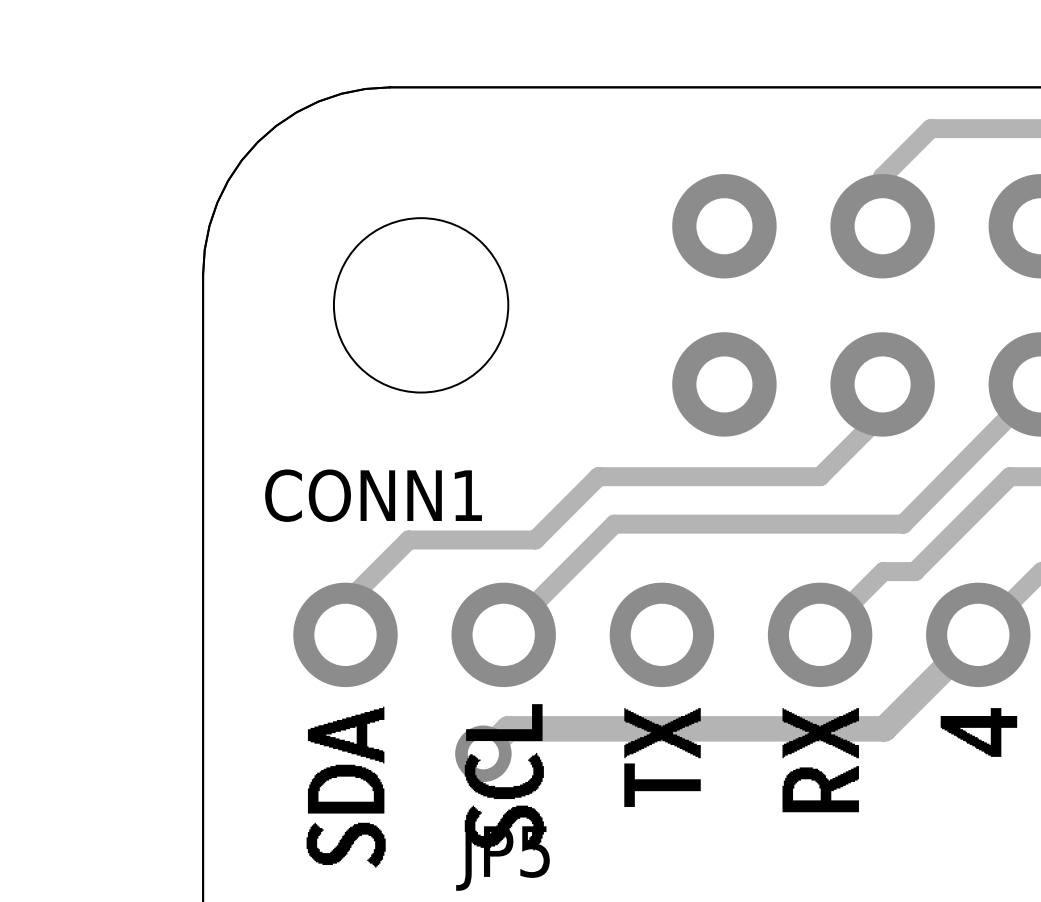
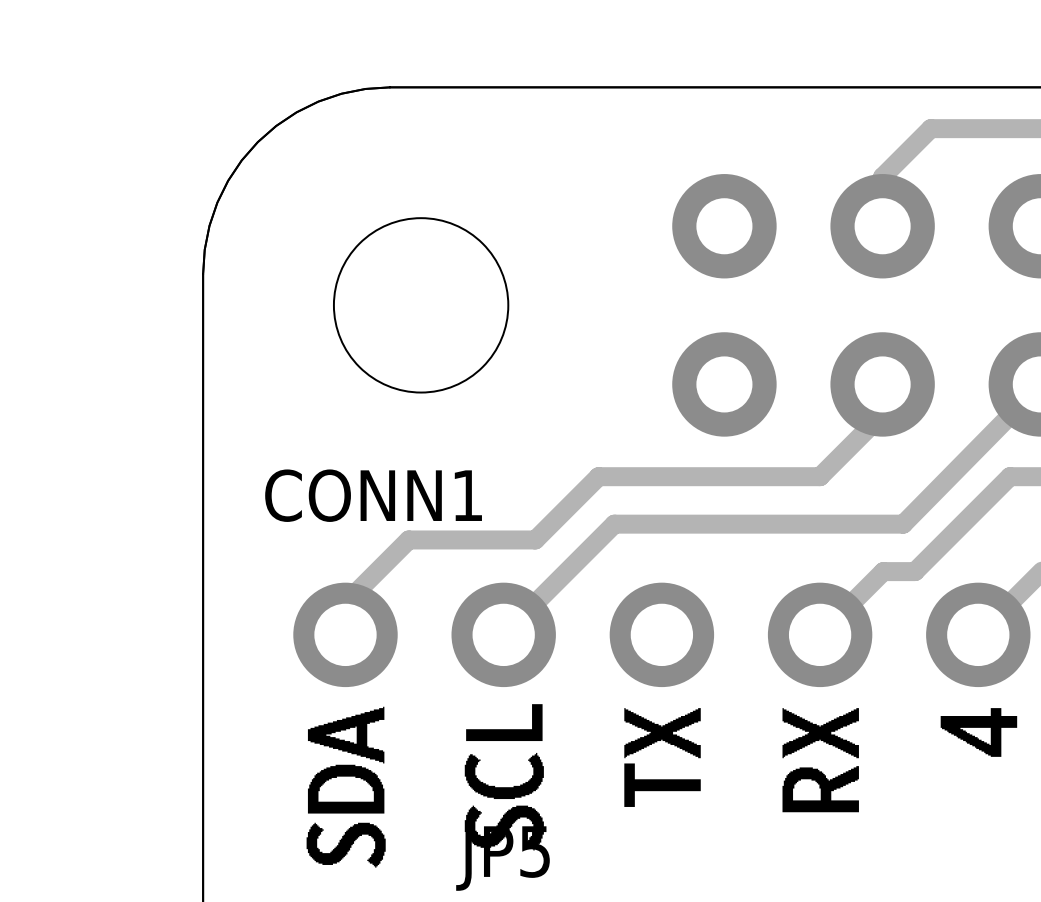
track: (978, 634) (884, 728) (508, 728) (483, 753) -> none
via: (483, 753) -> none

